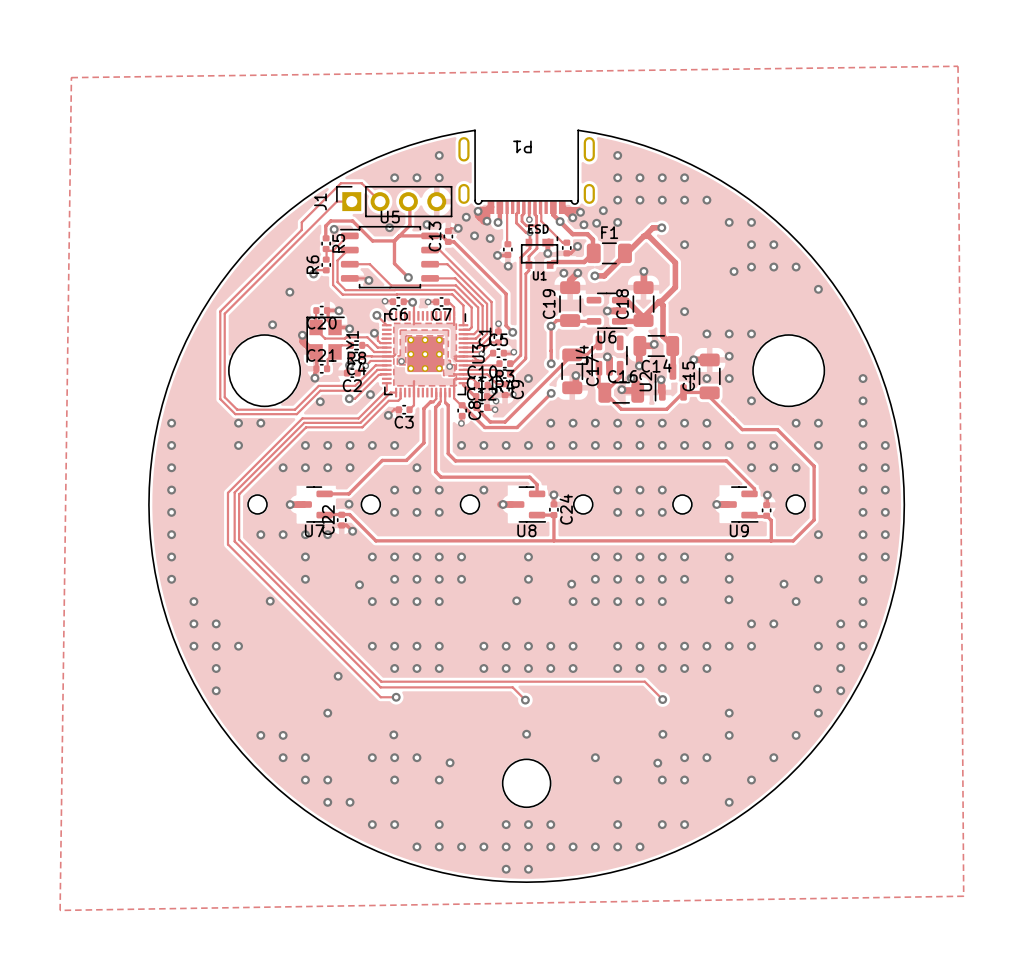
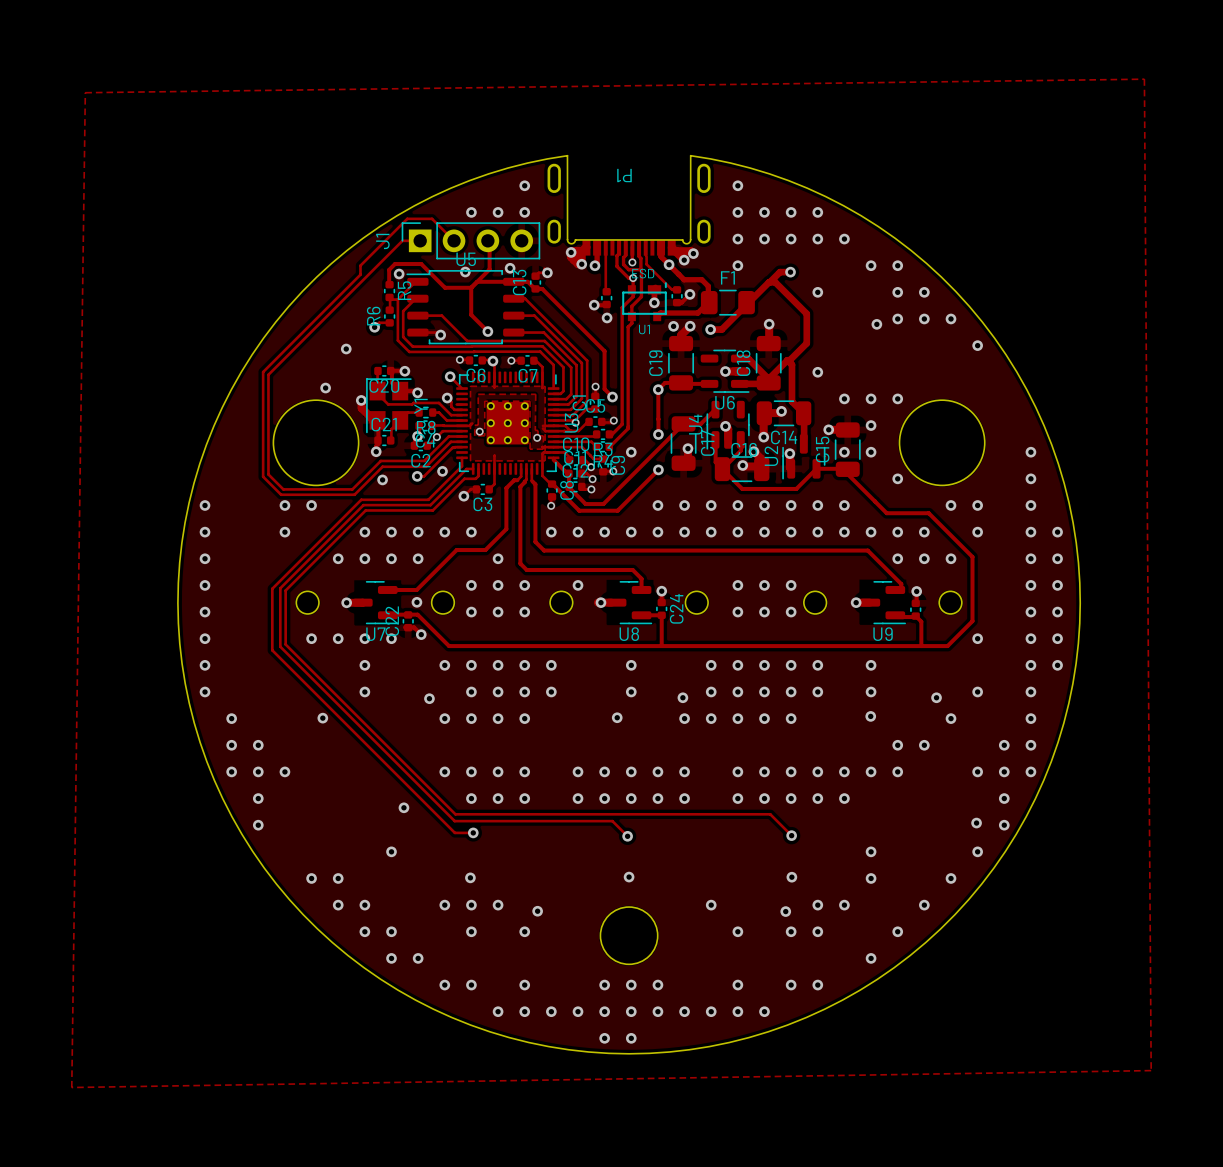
via: (603, 210) -> none
via: (466, 217) -> none
via: (596, 223) -> none
via: (583, 224) -> none
via: (474, 235) -> none
via: (490, 238) -> none

